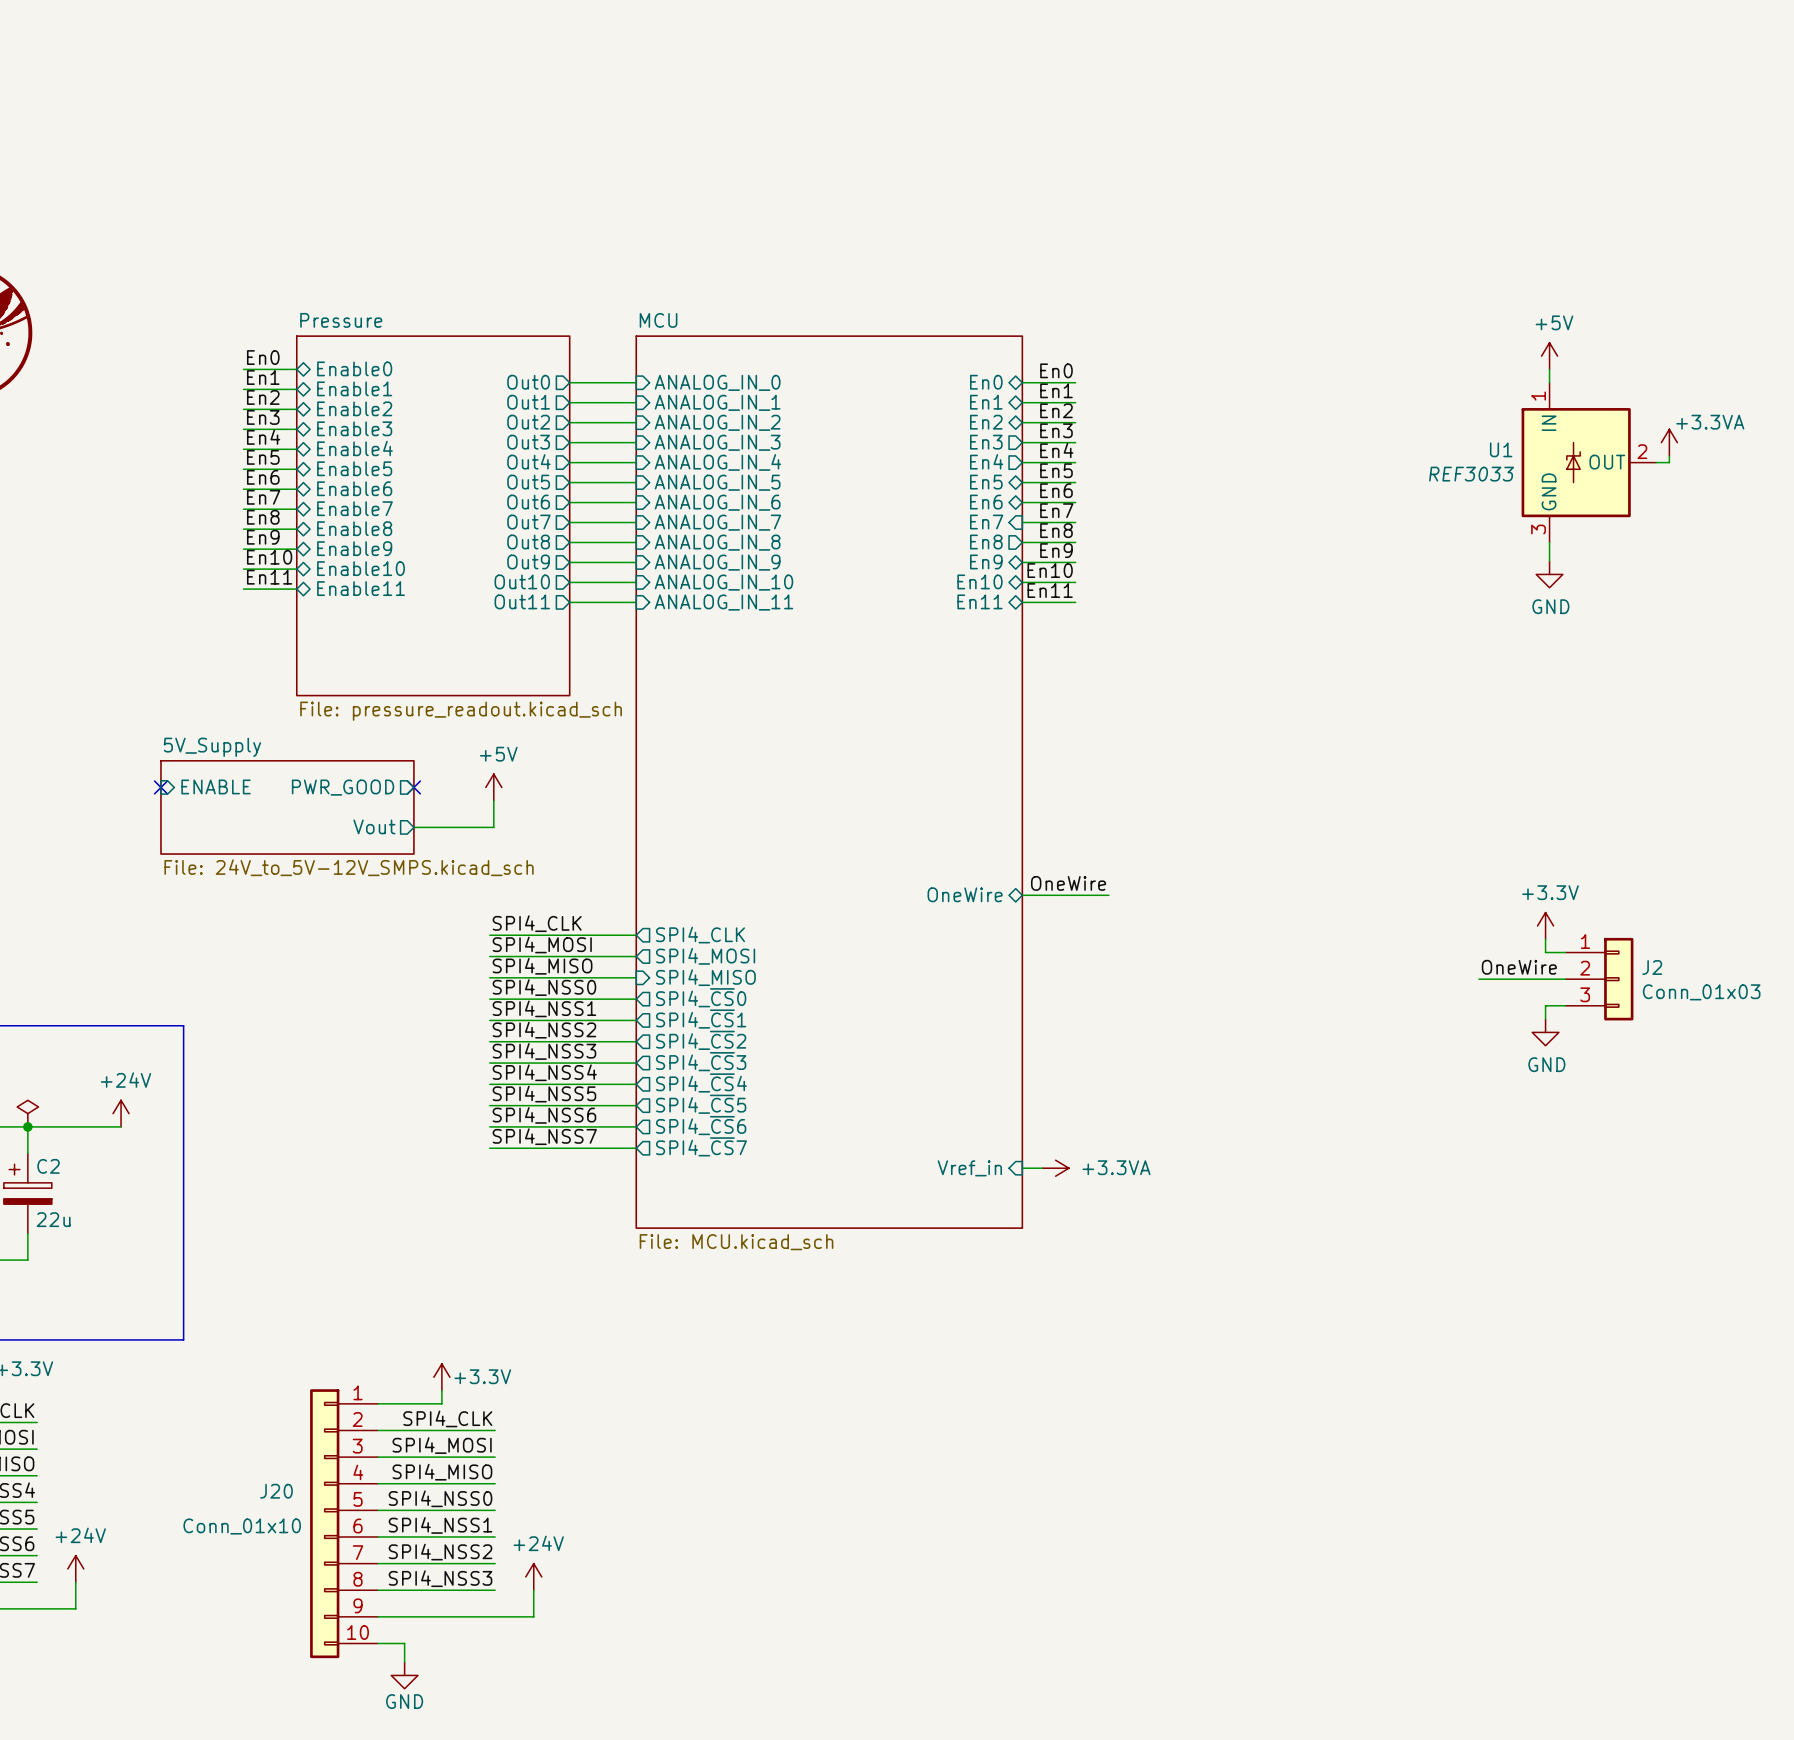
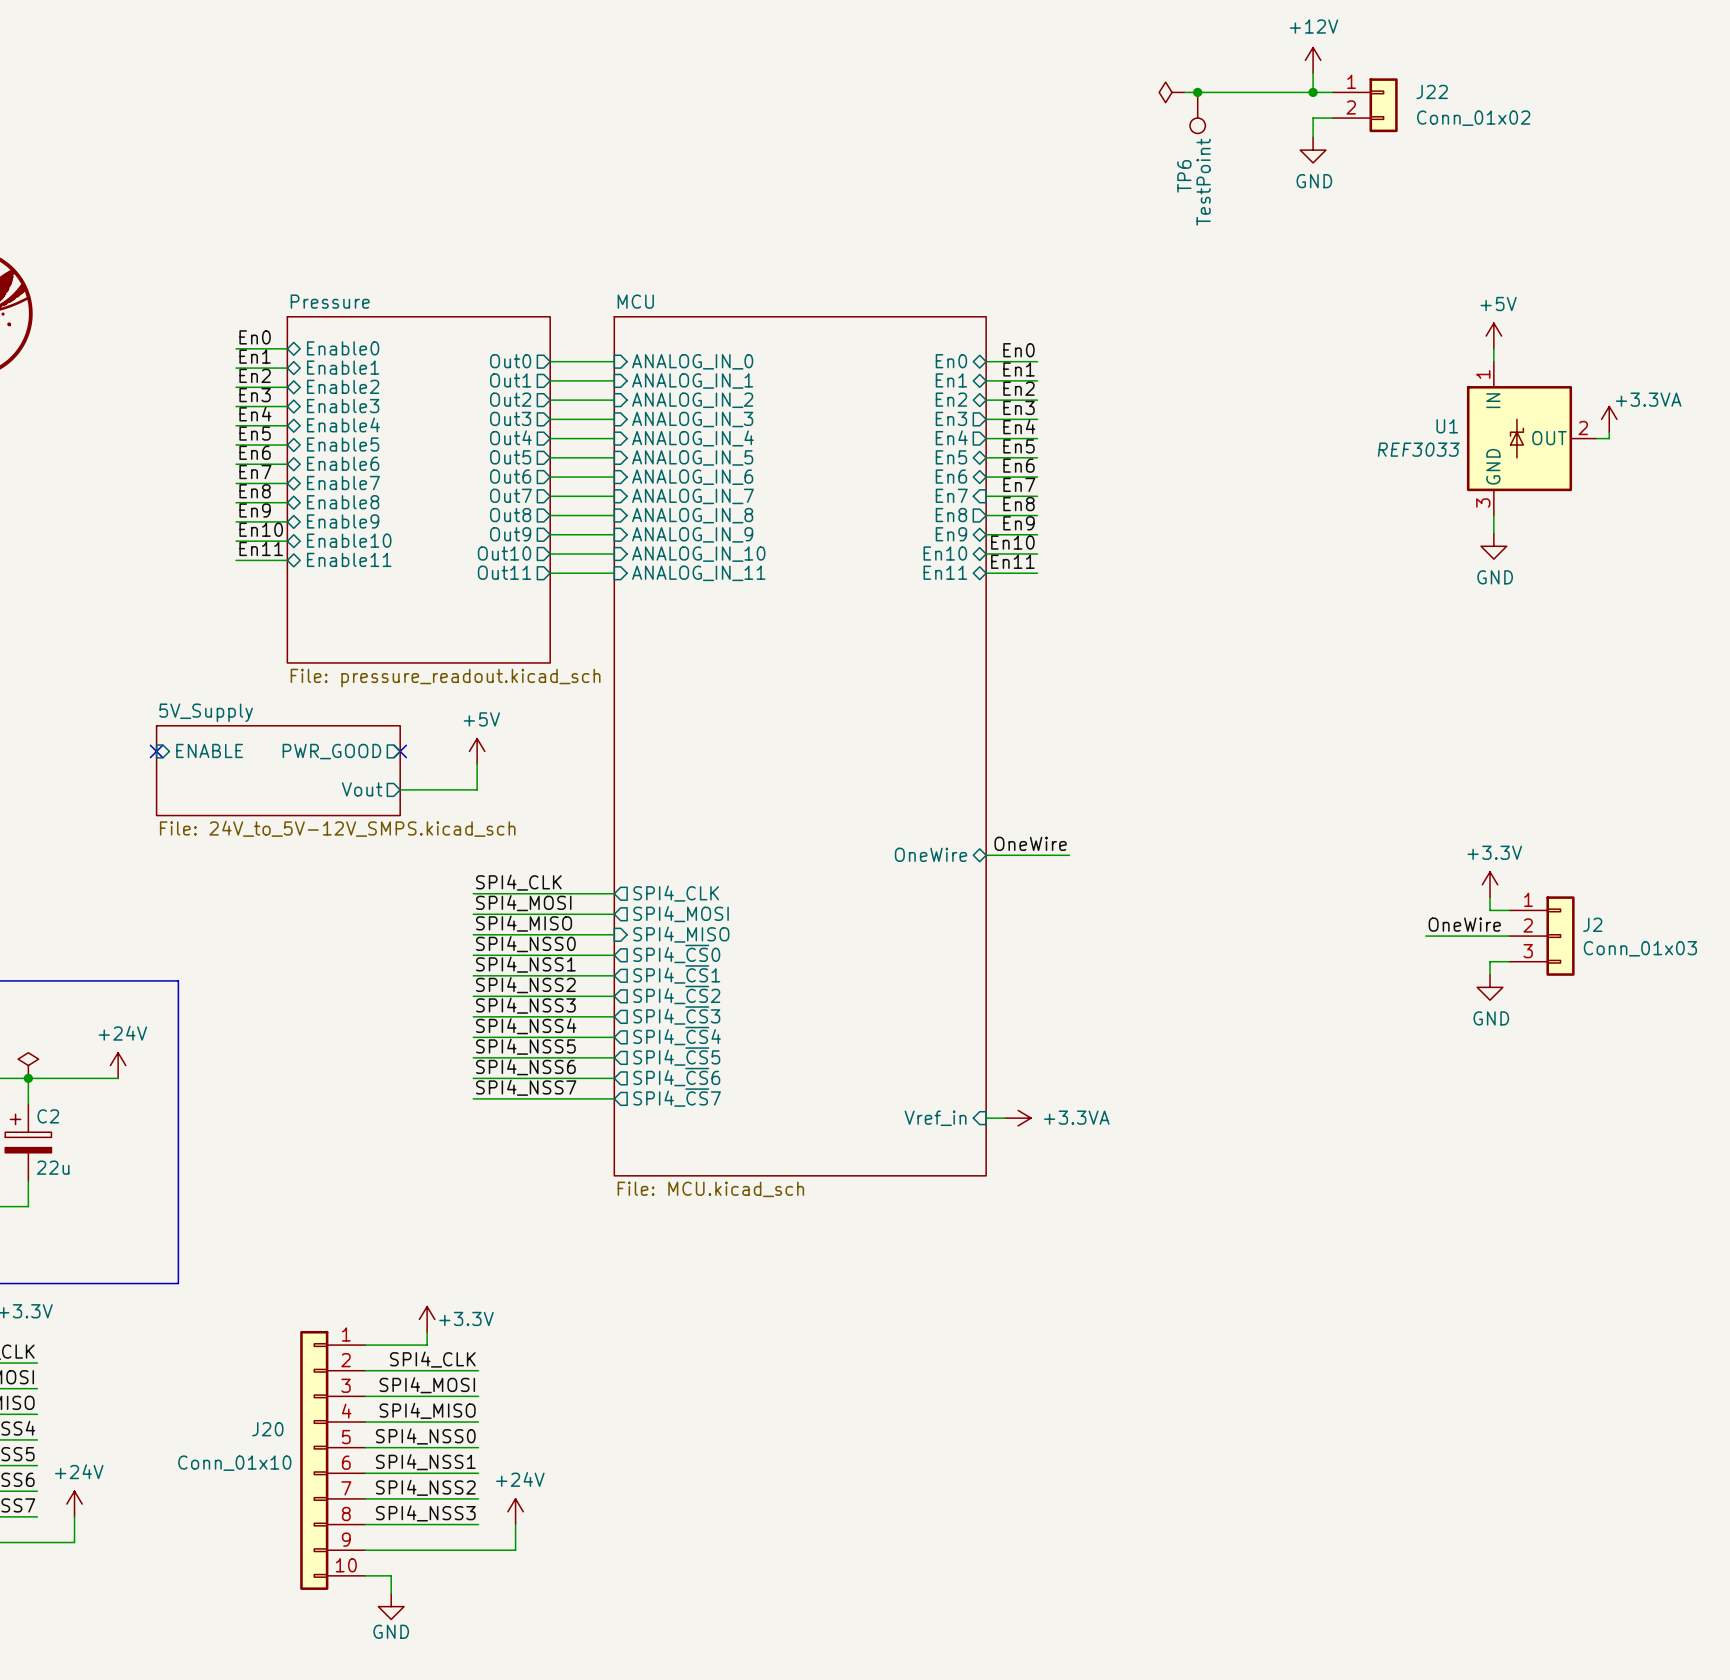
power symbol: none -> +12V (1313, 60)
wire: none -> (1313, 73) (1313, 92)
power symbol: none -> (1172, 92)
wire: none -> (1184, 92) (1332, 92)
junction: none -> (1197, 92)
junction: none -> (1313, 92)
J22: none -> Conn_01x02 (1365, 105)
TP6: none -> TestPoint (1197, 112)
wire: none -> (1332, 118) (1313, 118) (1313, 137)
power symbol: none -> GND (1313, 150)

